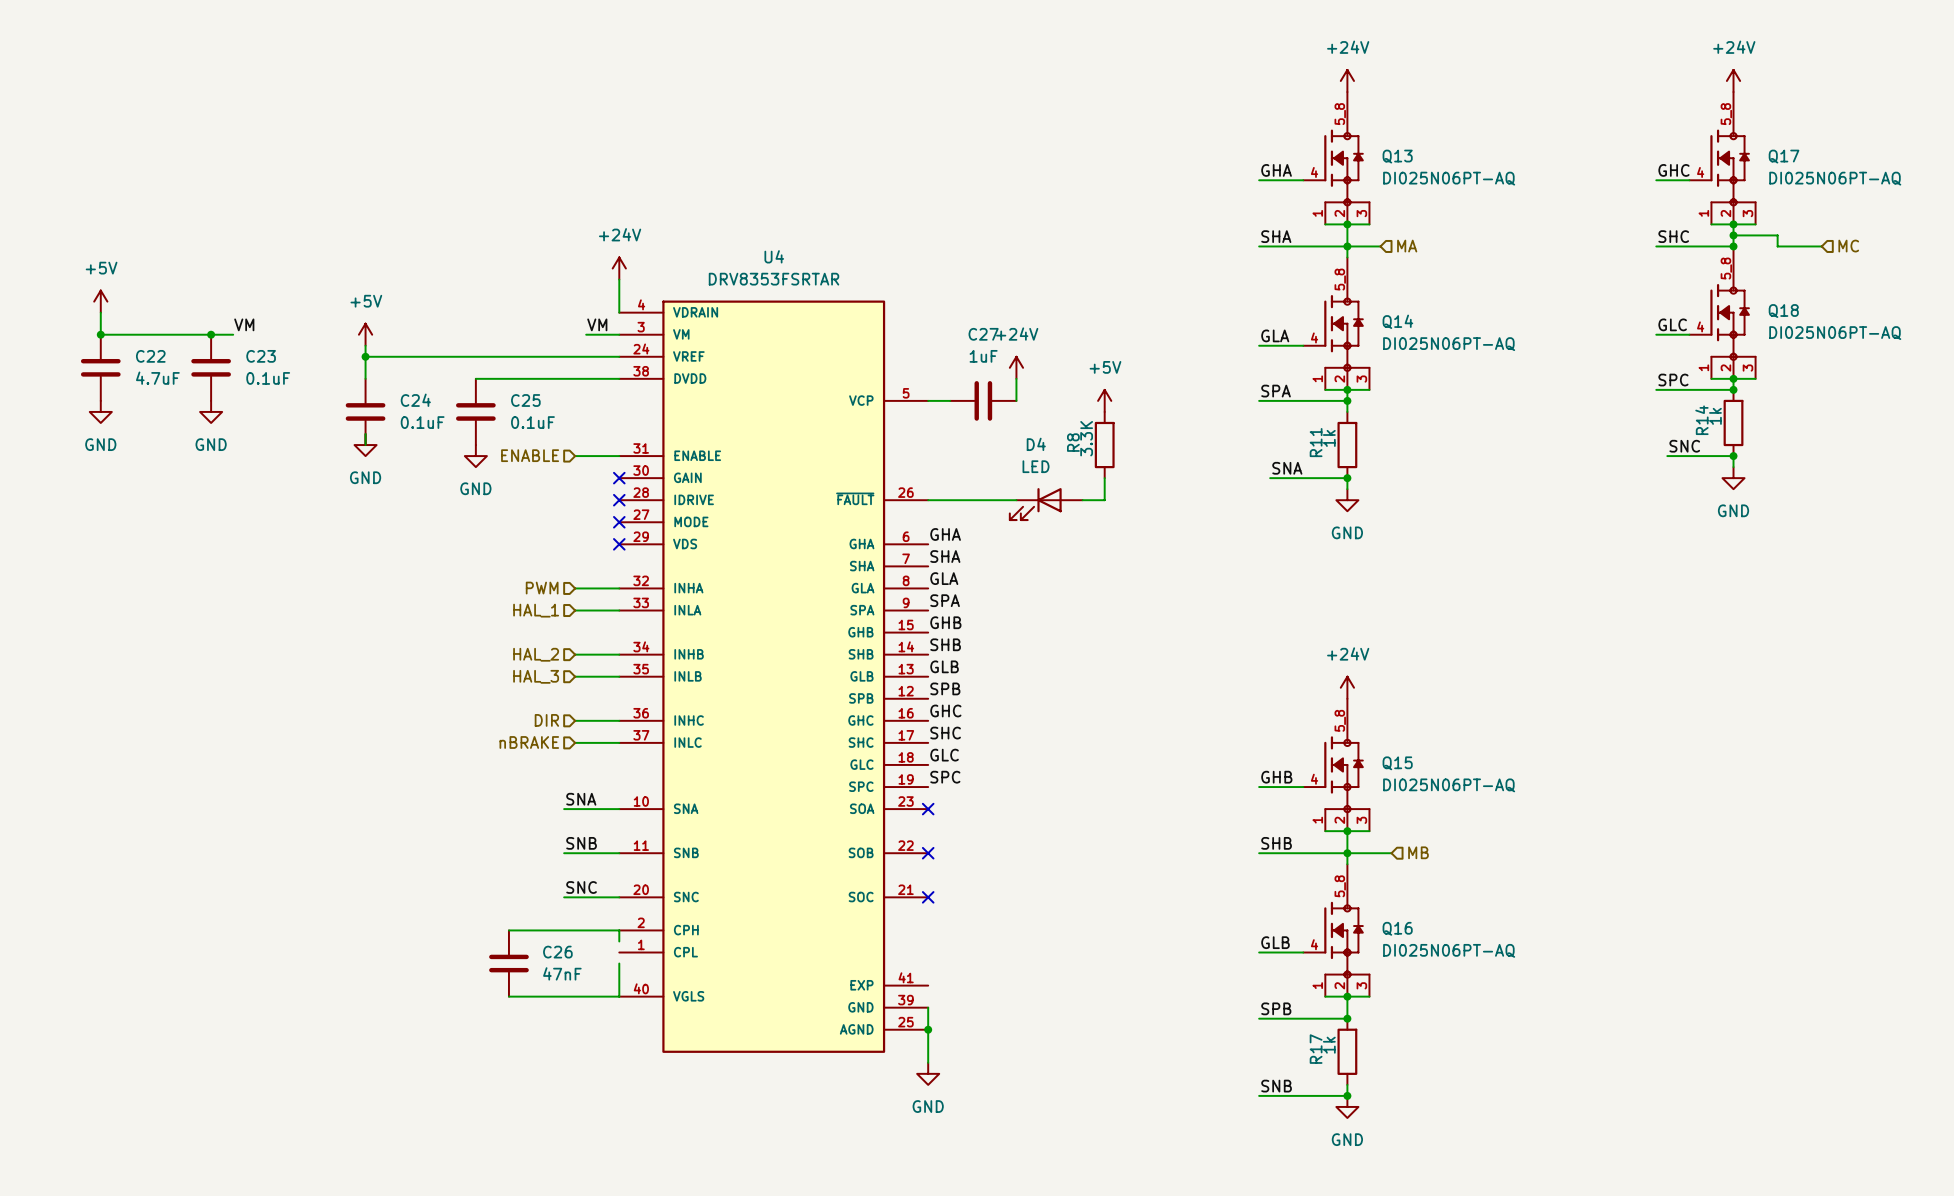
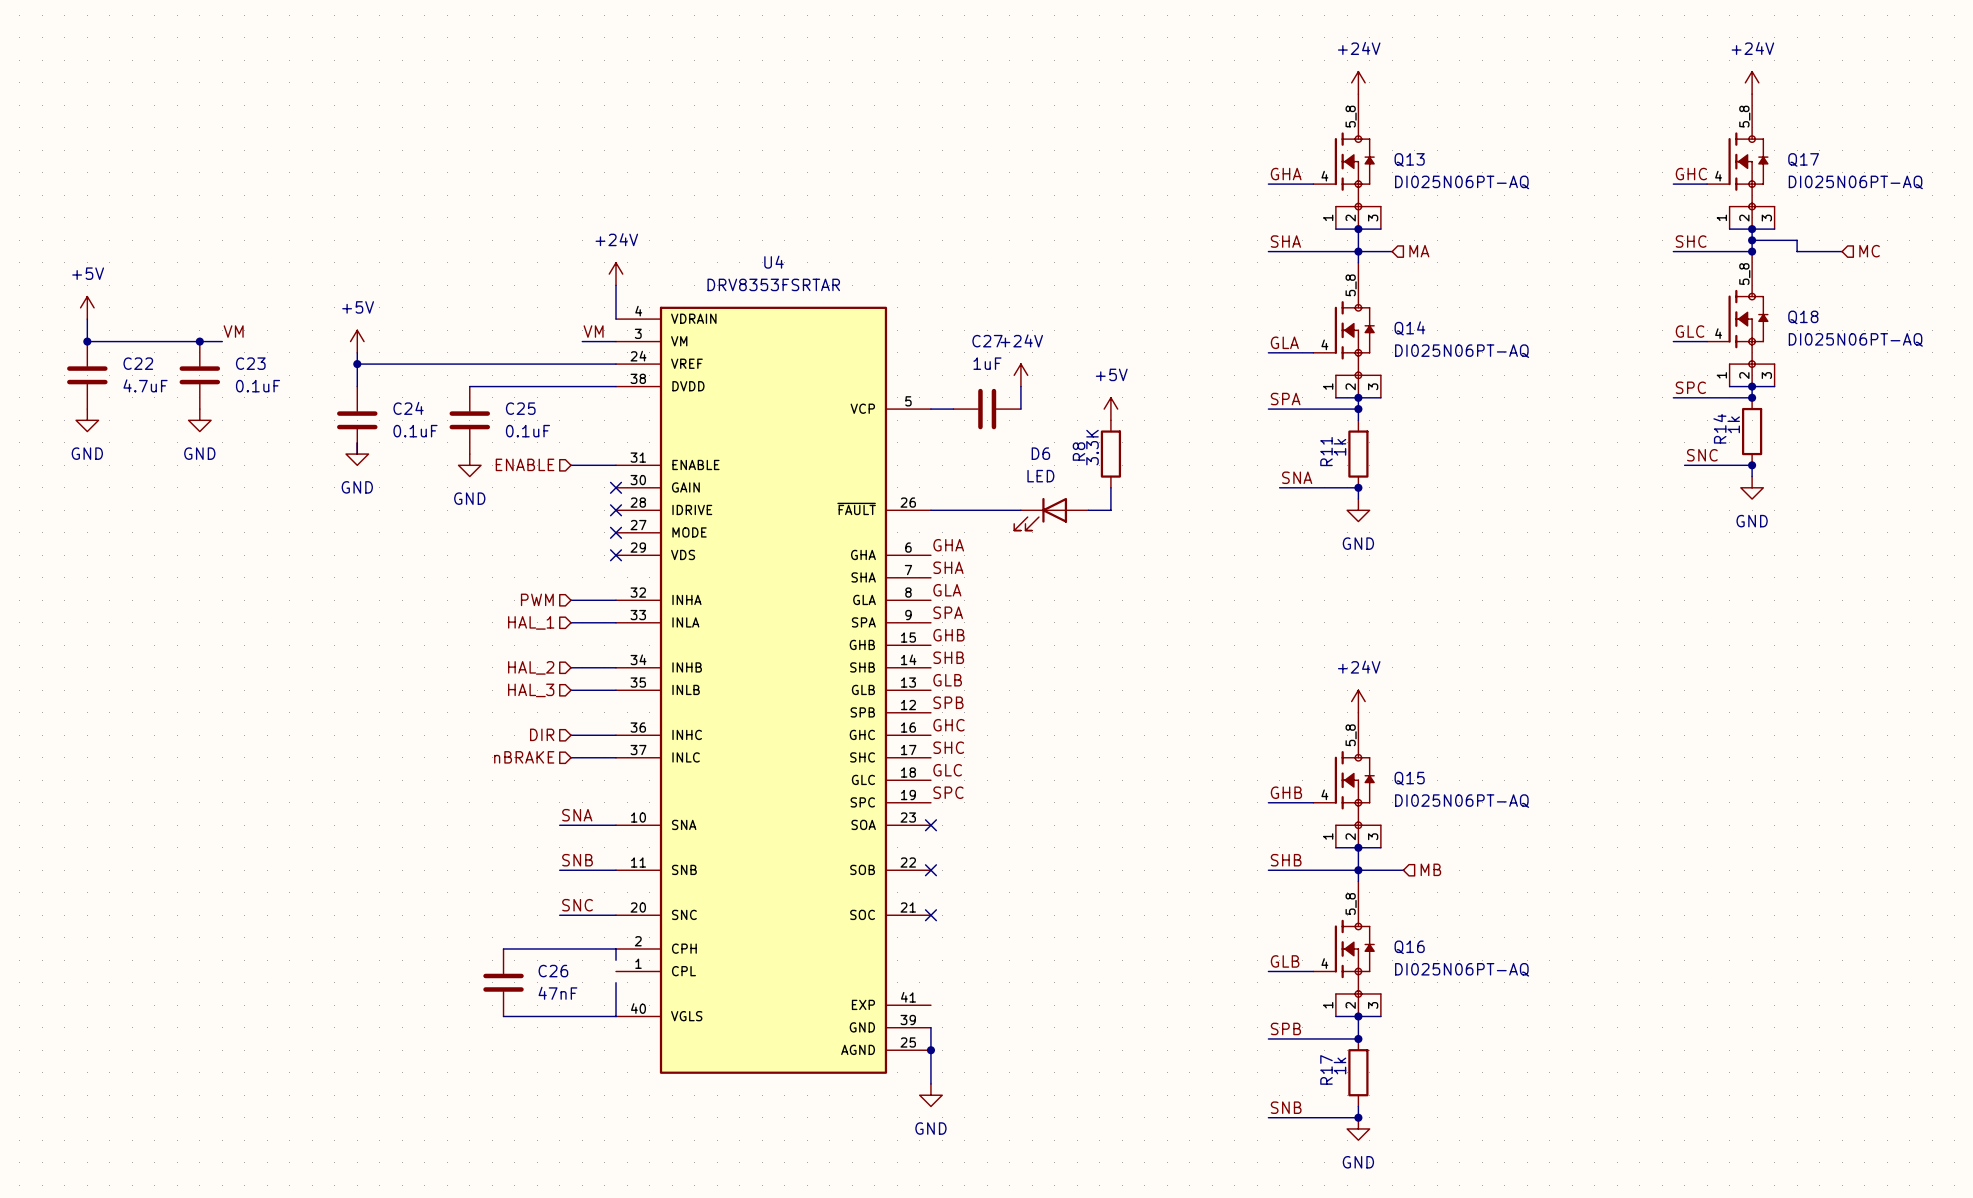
D4 name: D4 (1036, 444) -> D6 (1040, 453)

